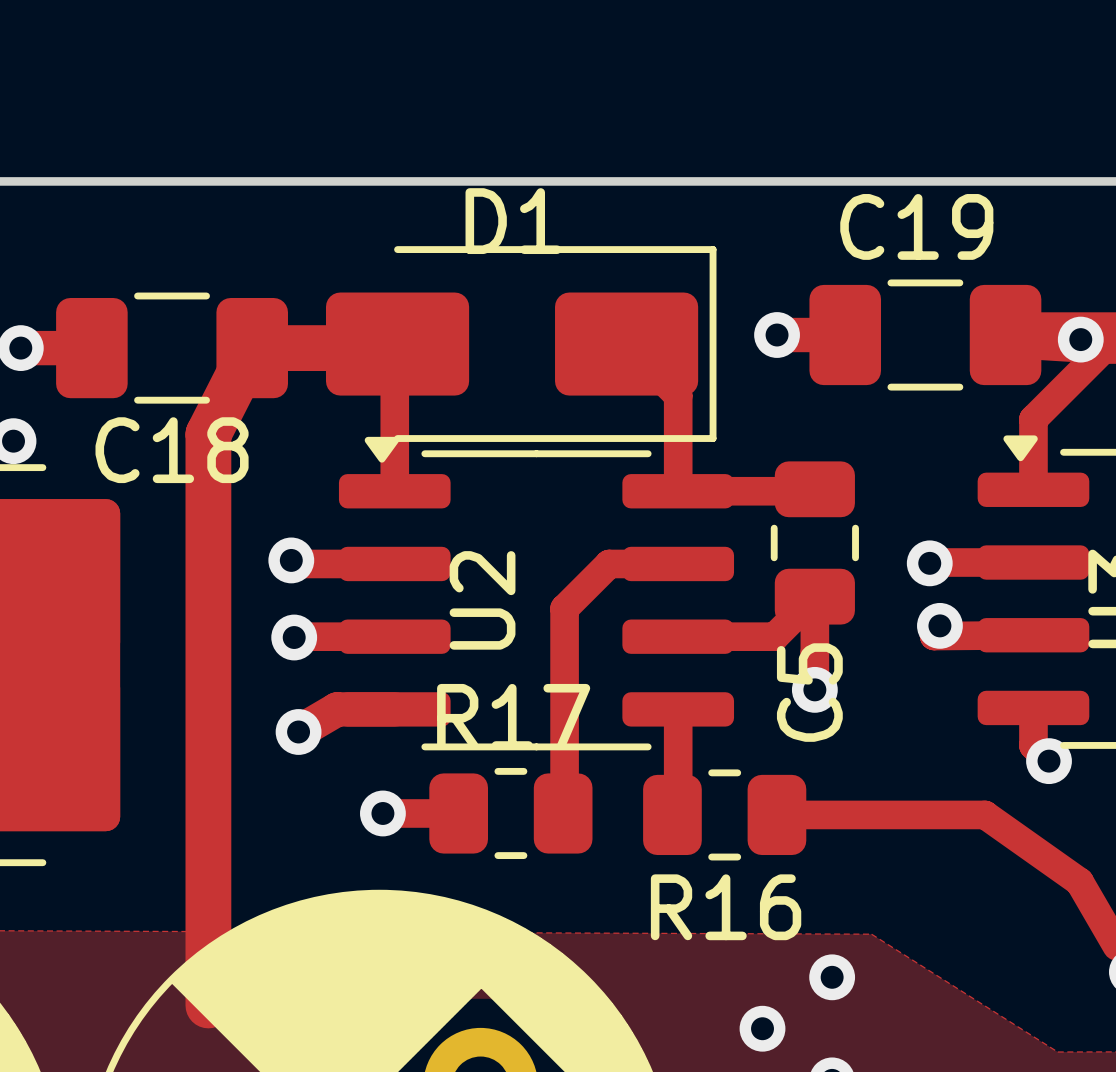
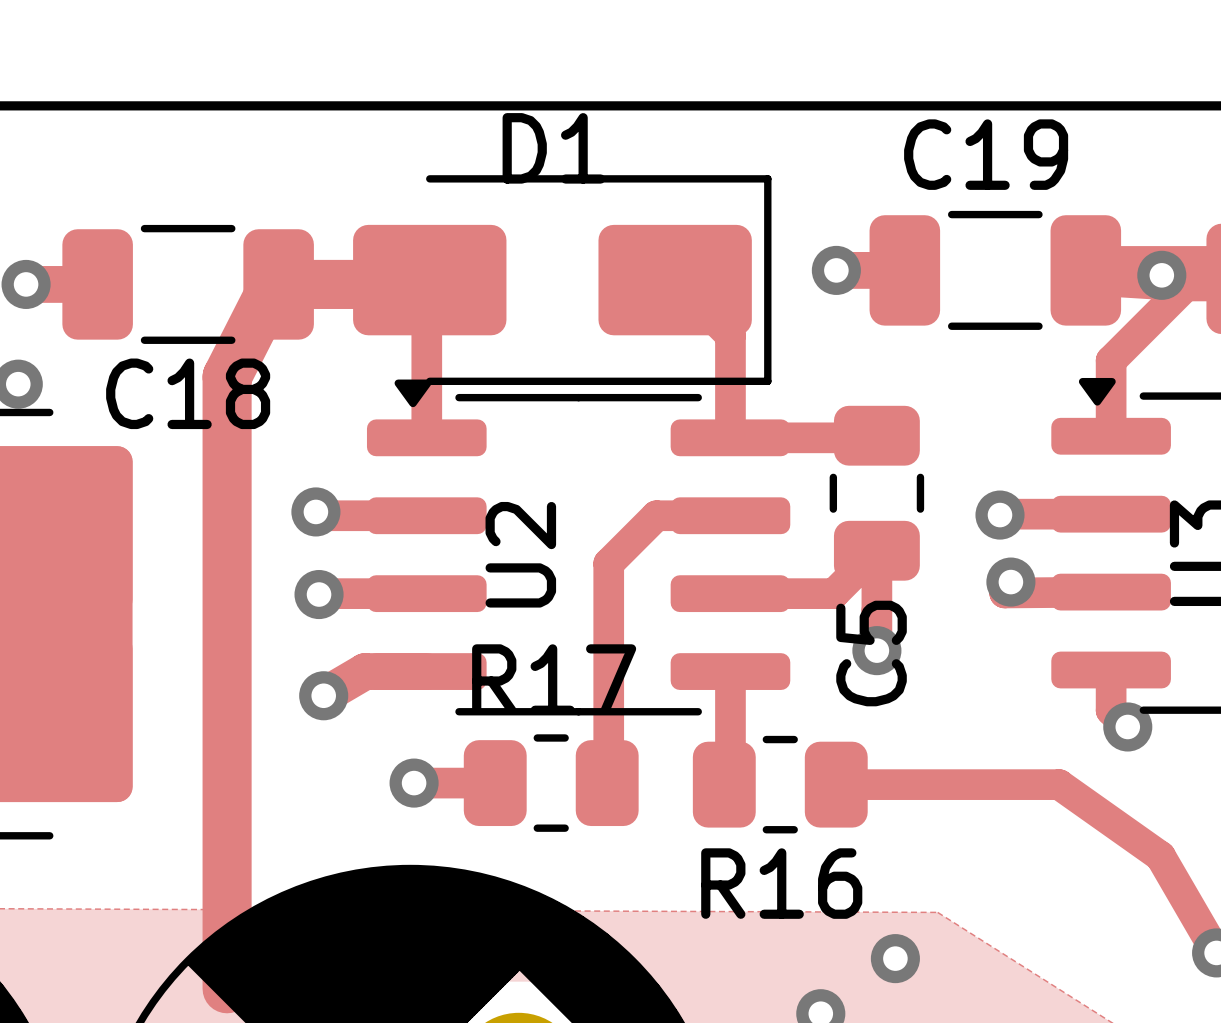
C19 footprint: [809, 279, 1042, 391] -> [869, 210, 1122, 330]
C18 footprint: [56, 292, 288, 404] -> [62, 224, 314, 344]

